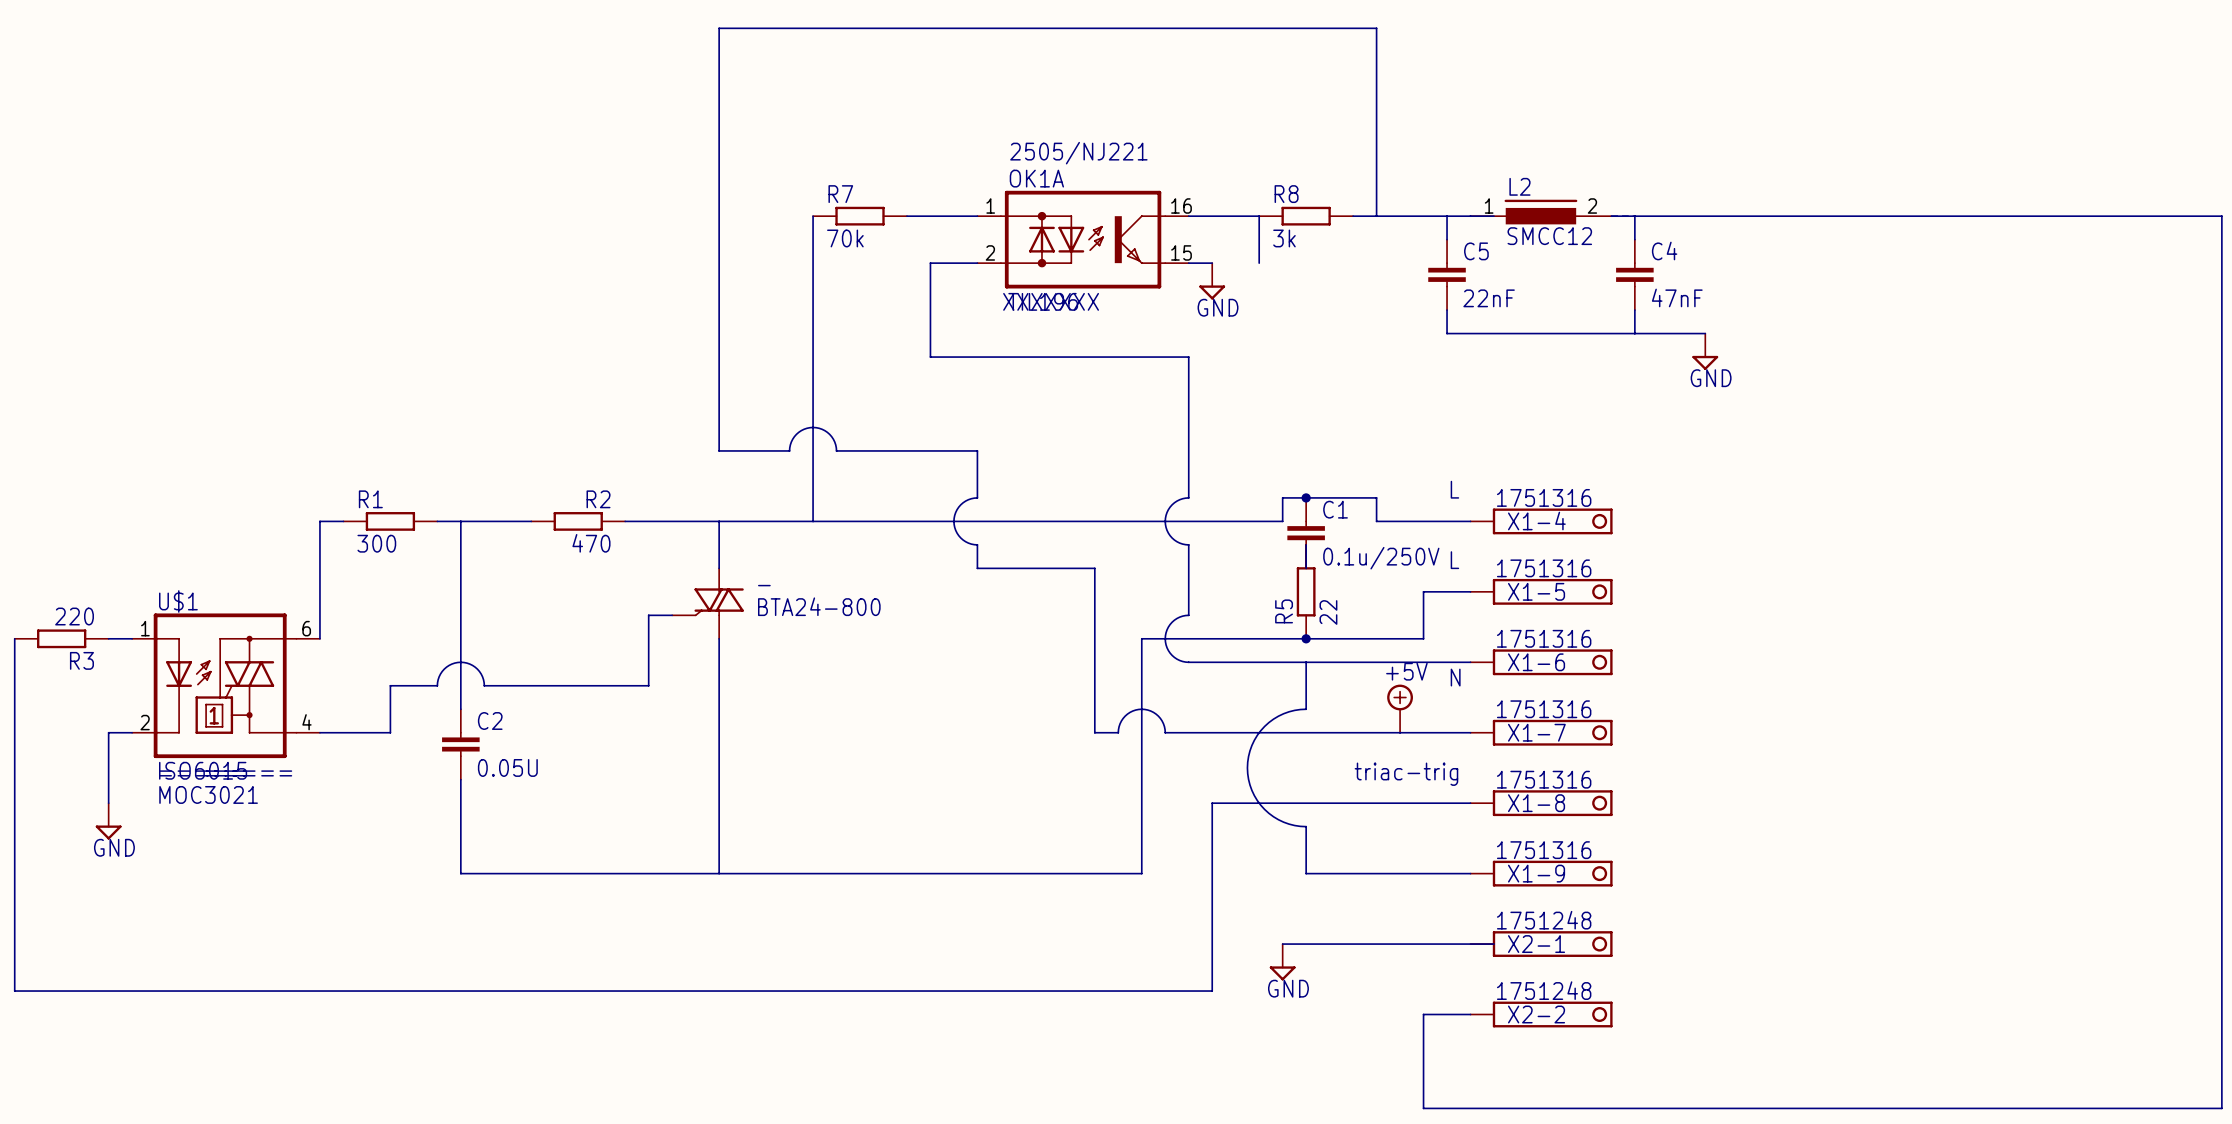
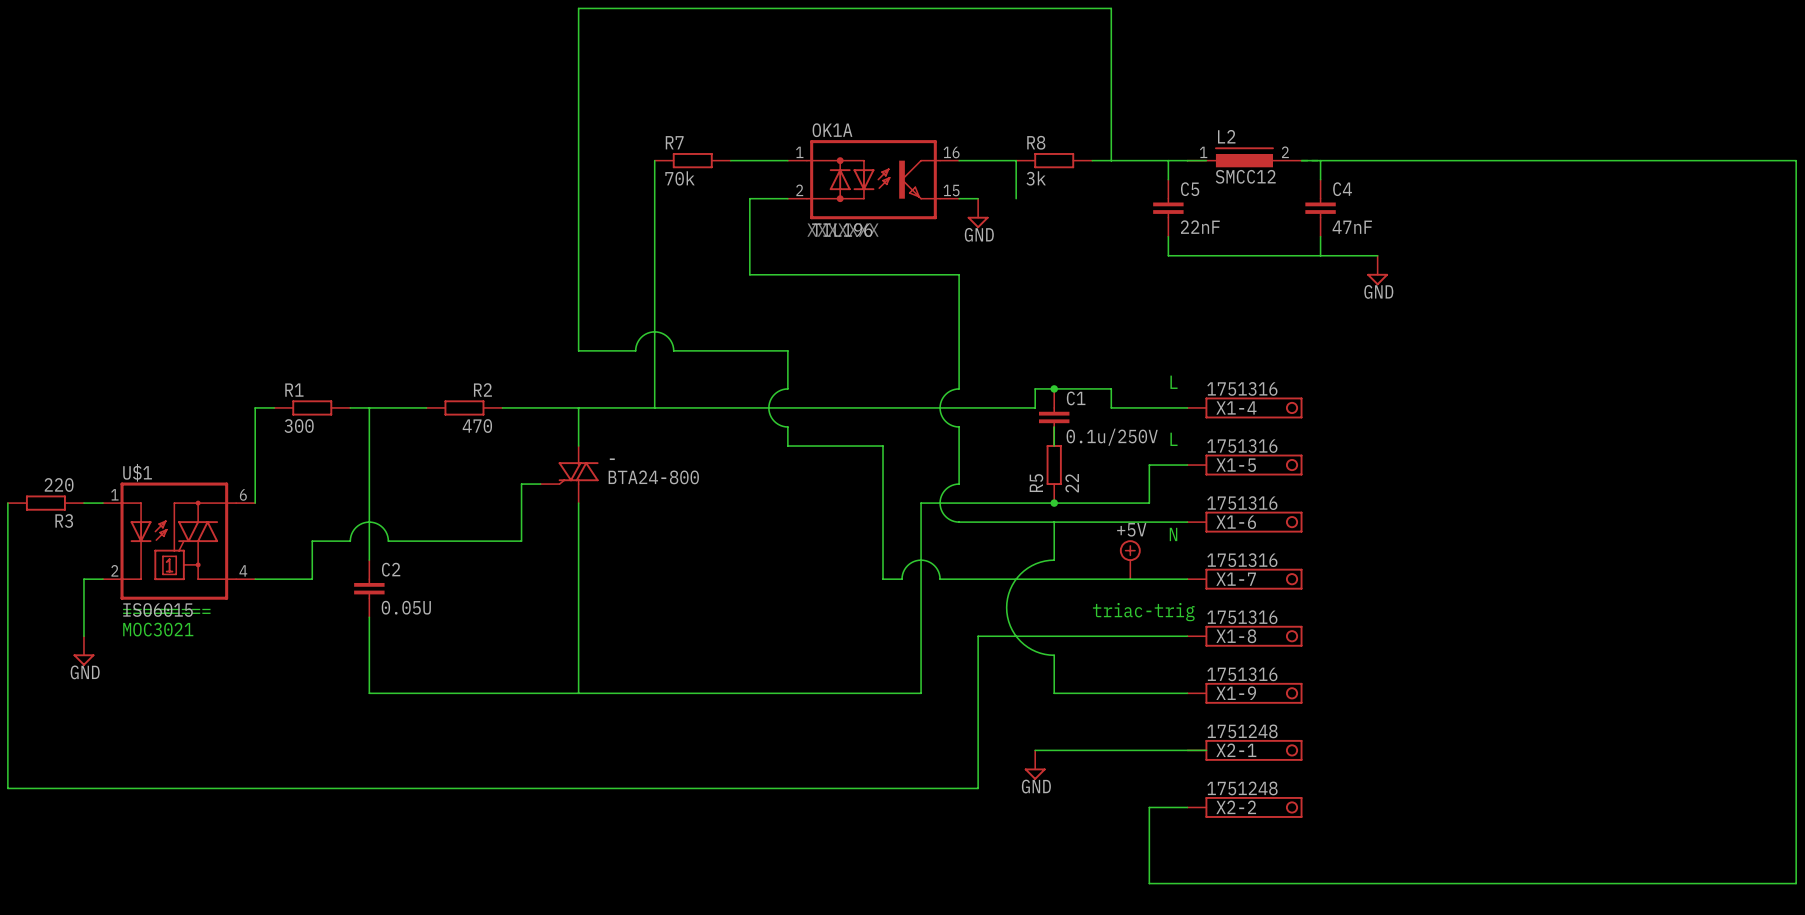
text: 2505/NJ221 (1078, 153) -> none

